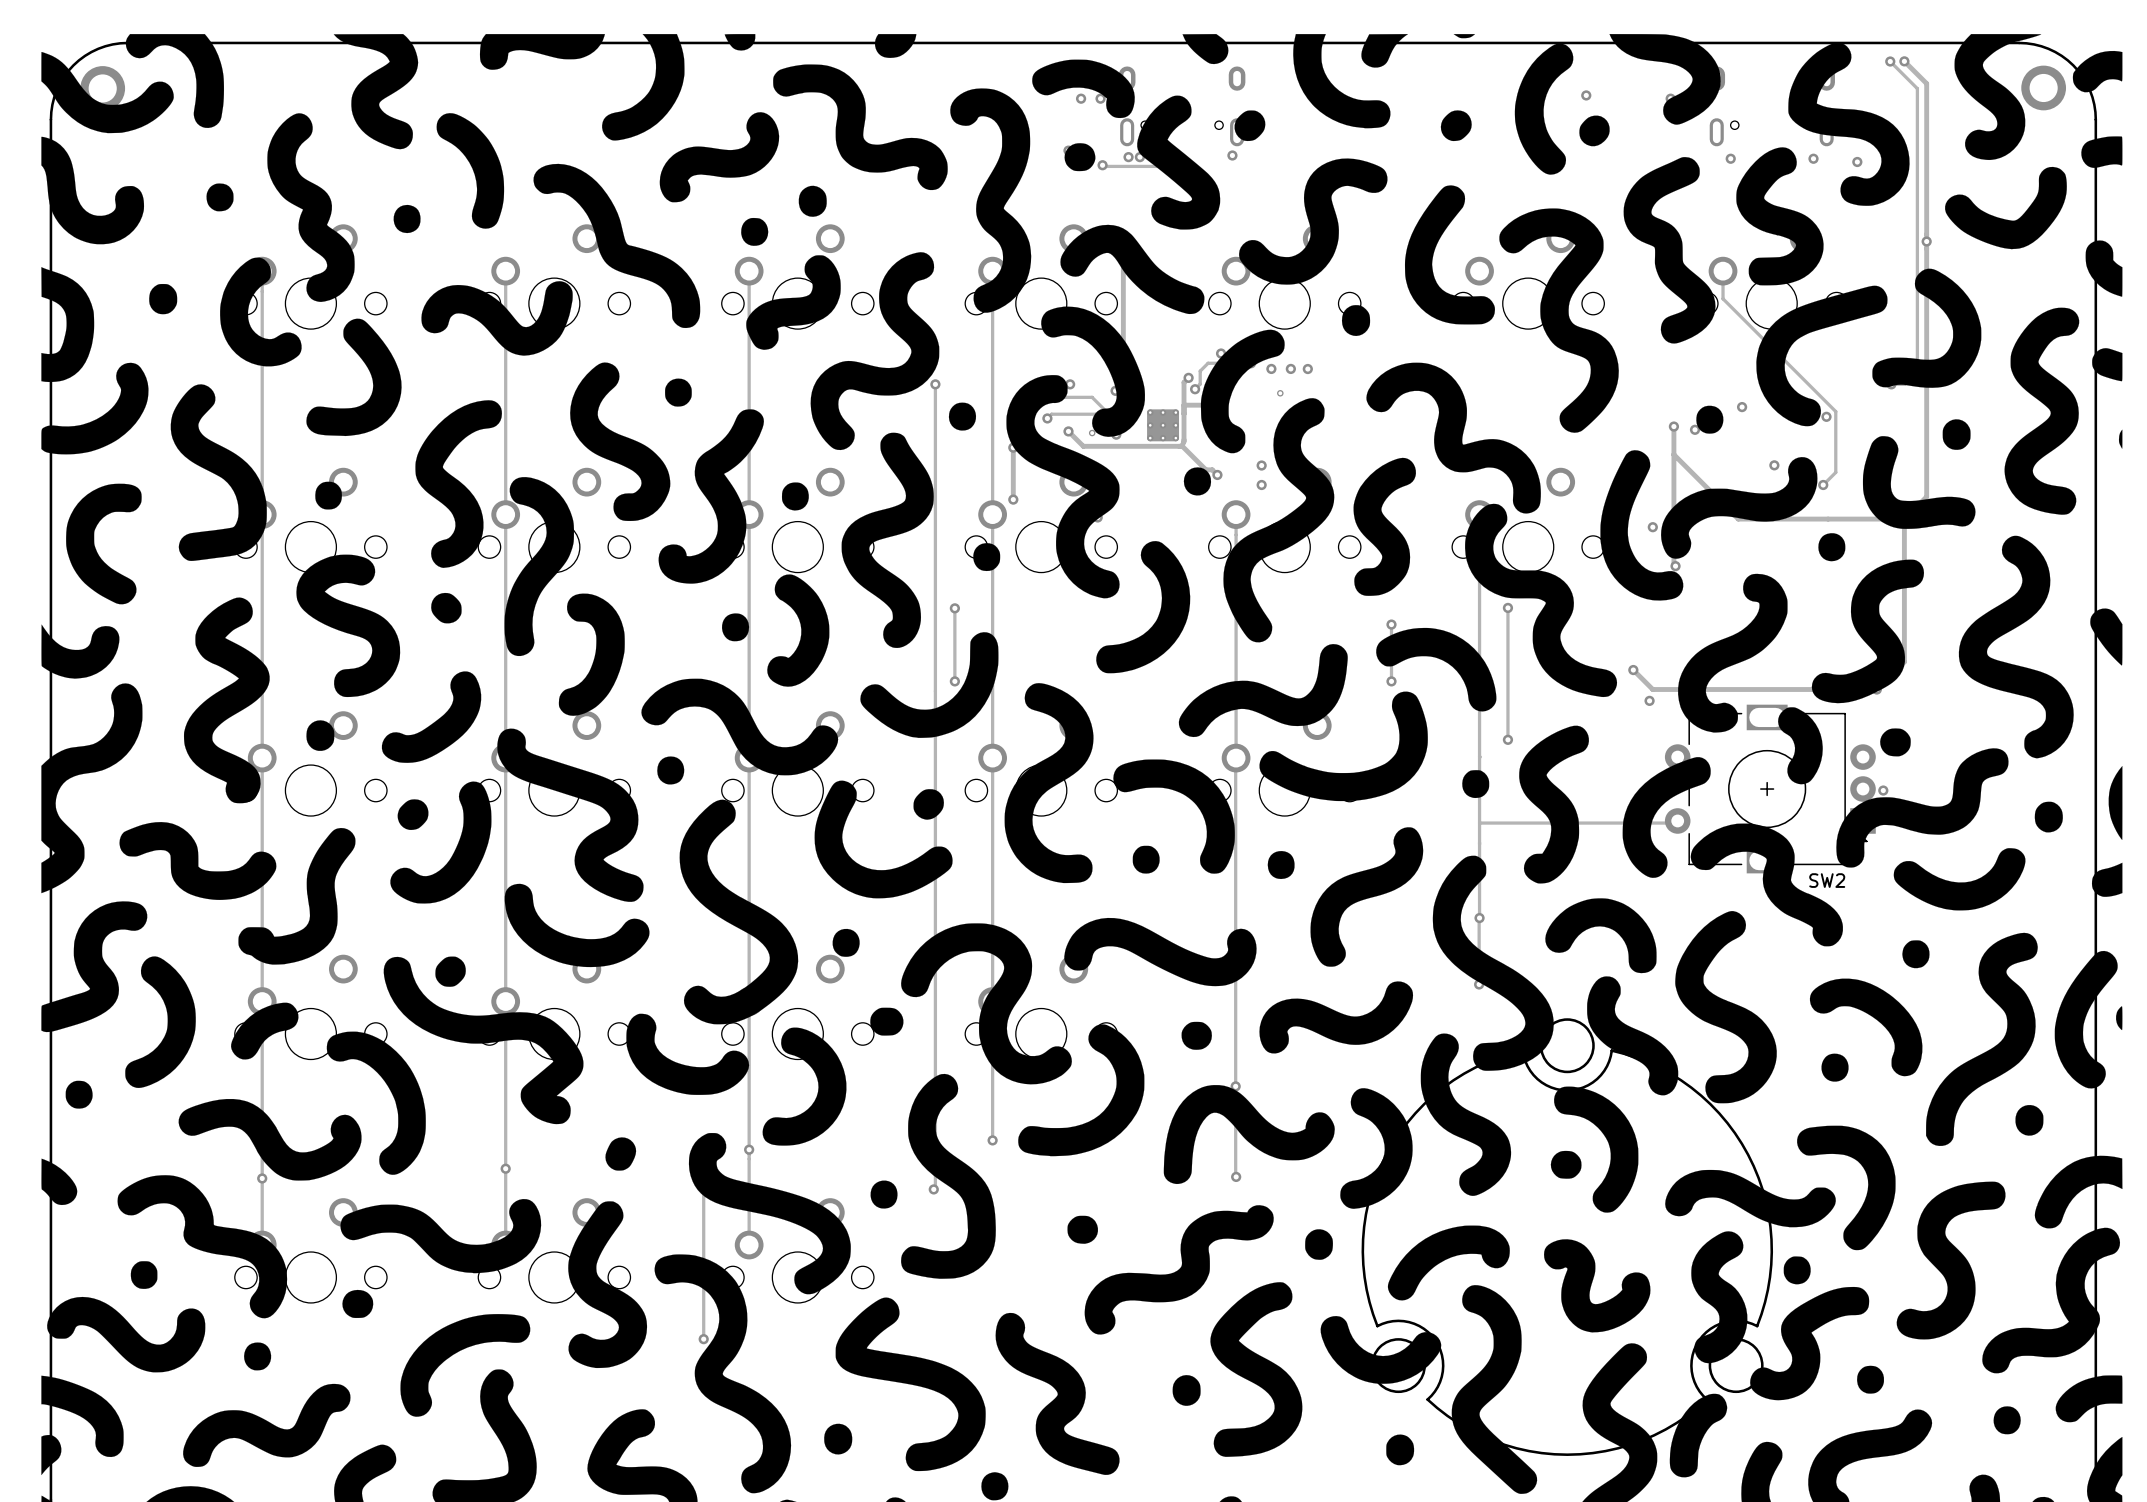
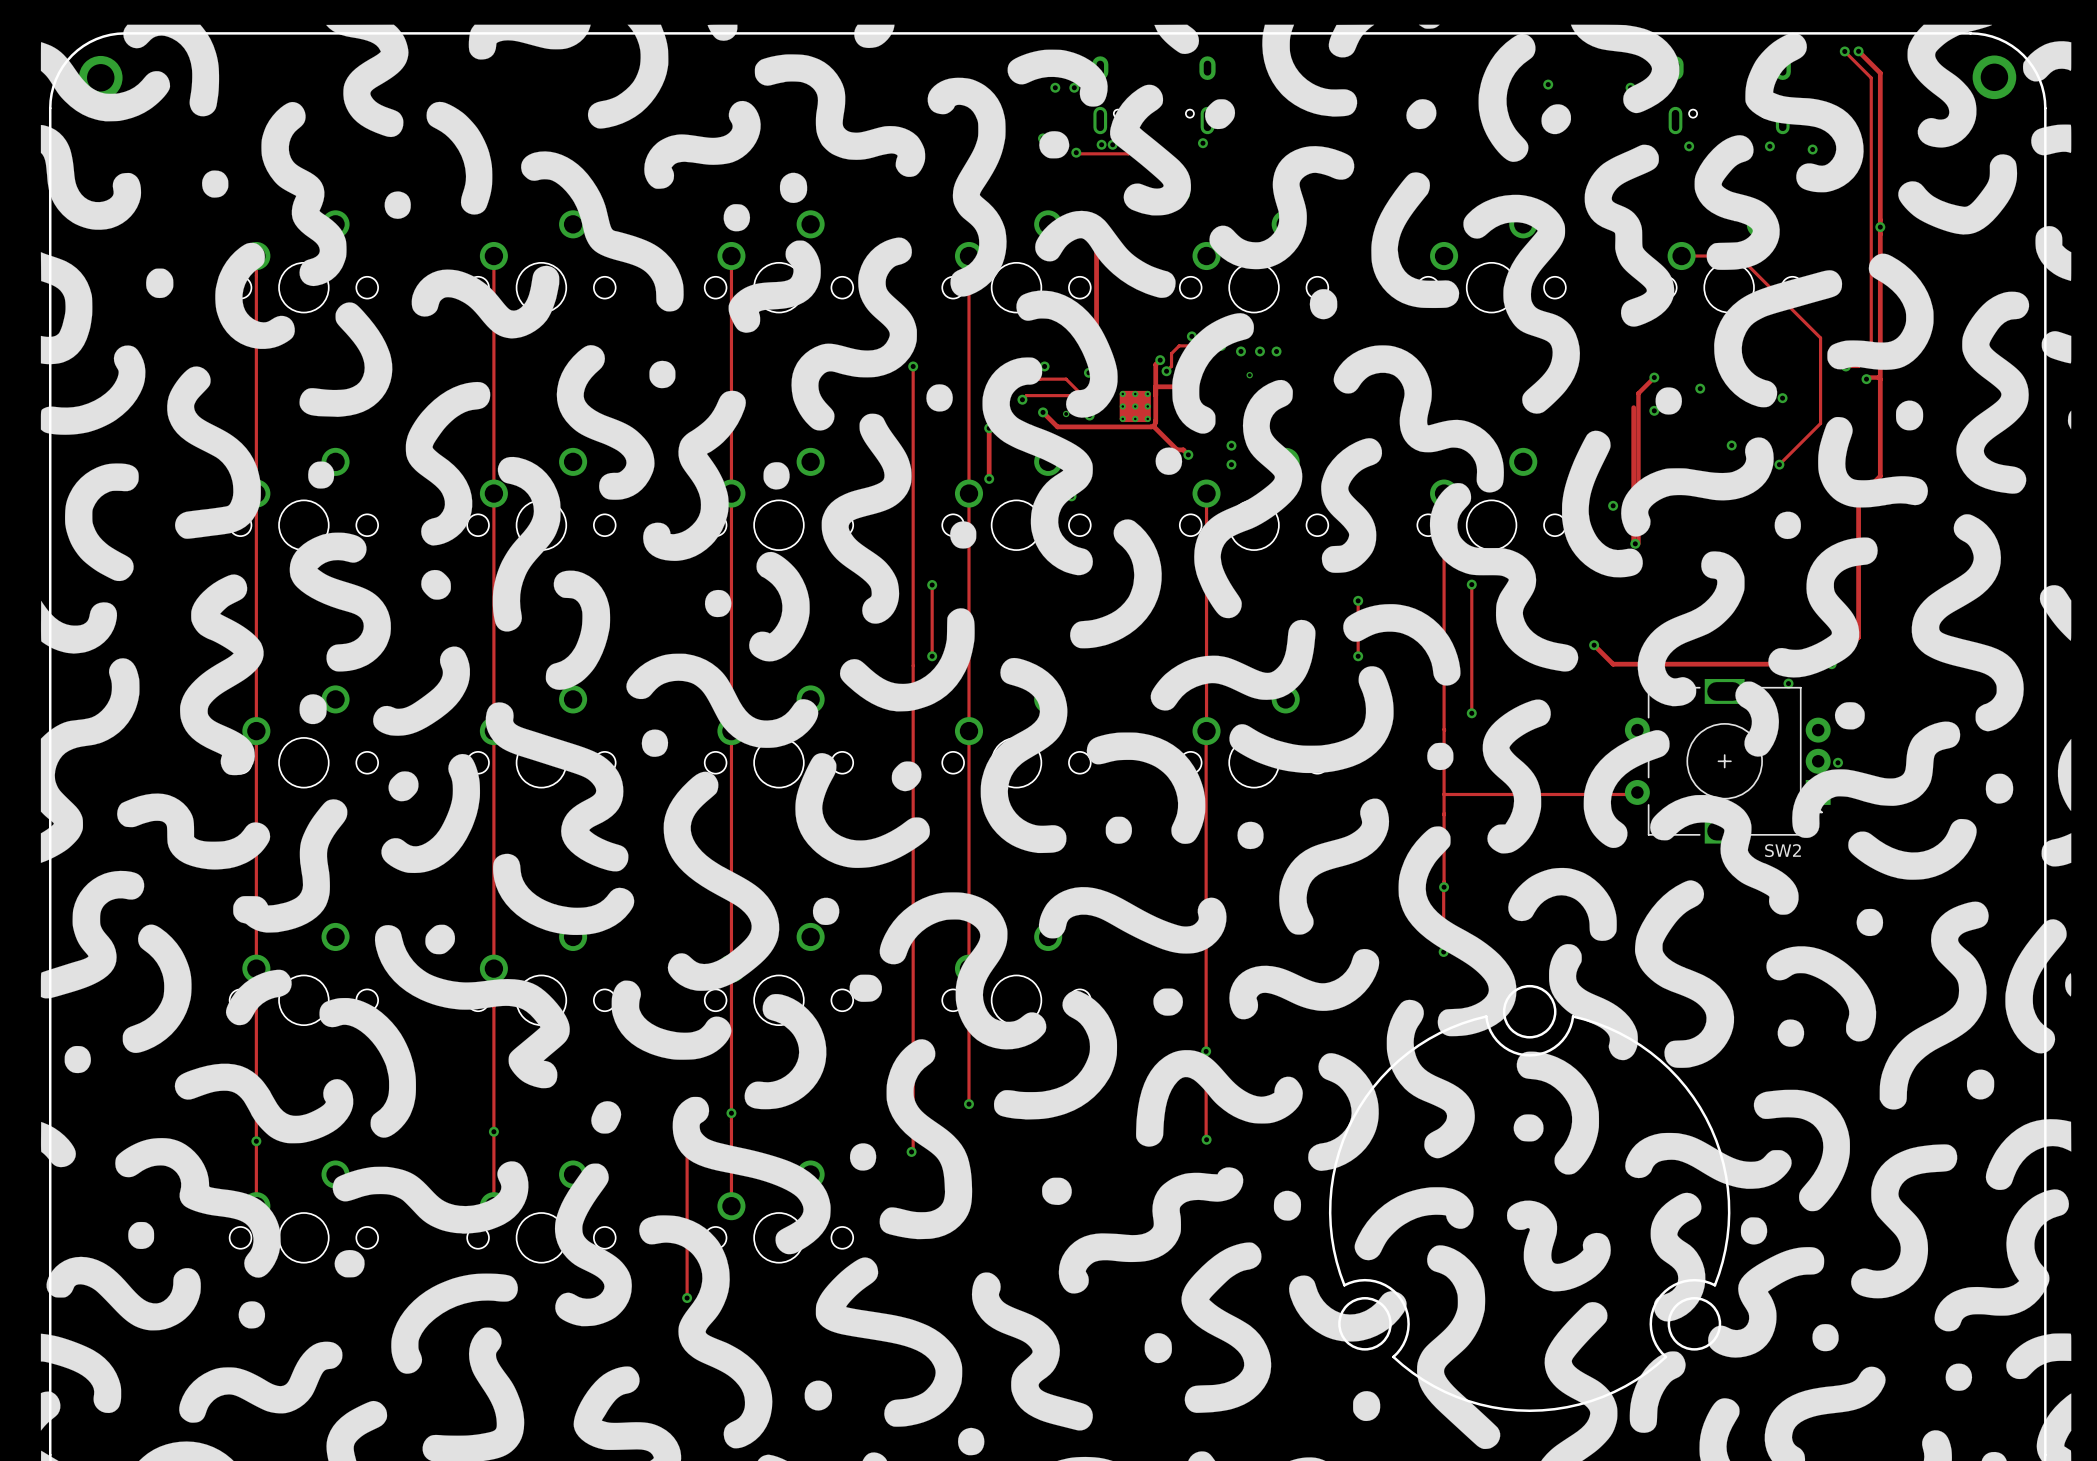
track: (1723, 271) (1723, 298) (1835, 411) (1835, 472) -> (1681, 256) (1738, 256) (1820, 337) (1820, 423) (1791, 452)
track: none -> (1654, 377) (1638, 393) (1638, 543)
track: none -> (1866, 379) (1878, 377) (1880, 379)
via: none -> (1866, 379)
via position: (1673, 426) -> (1654, 377)
track: (1673, 454) (1738, 519) (1904, 519) -> none
via: (1649, 700) -> none
via: none -> (1788, 683)

